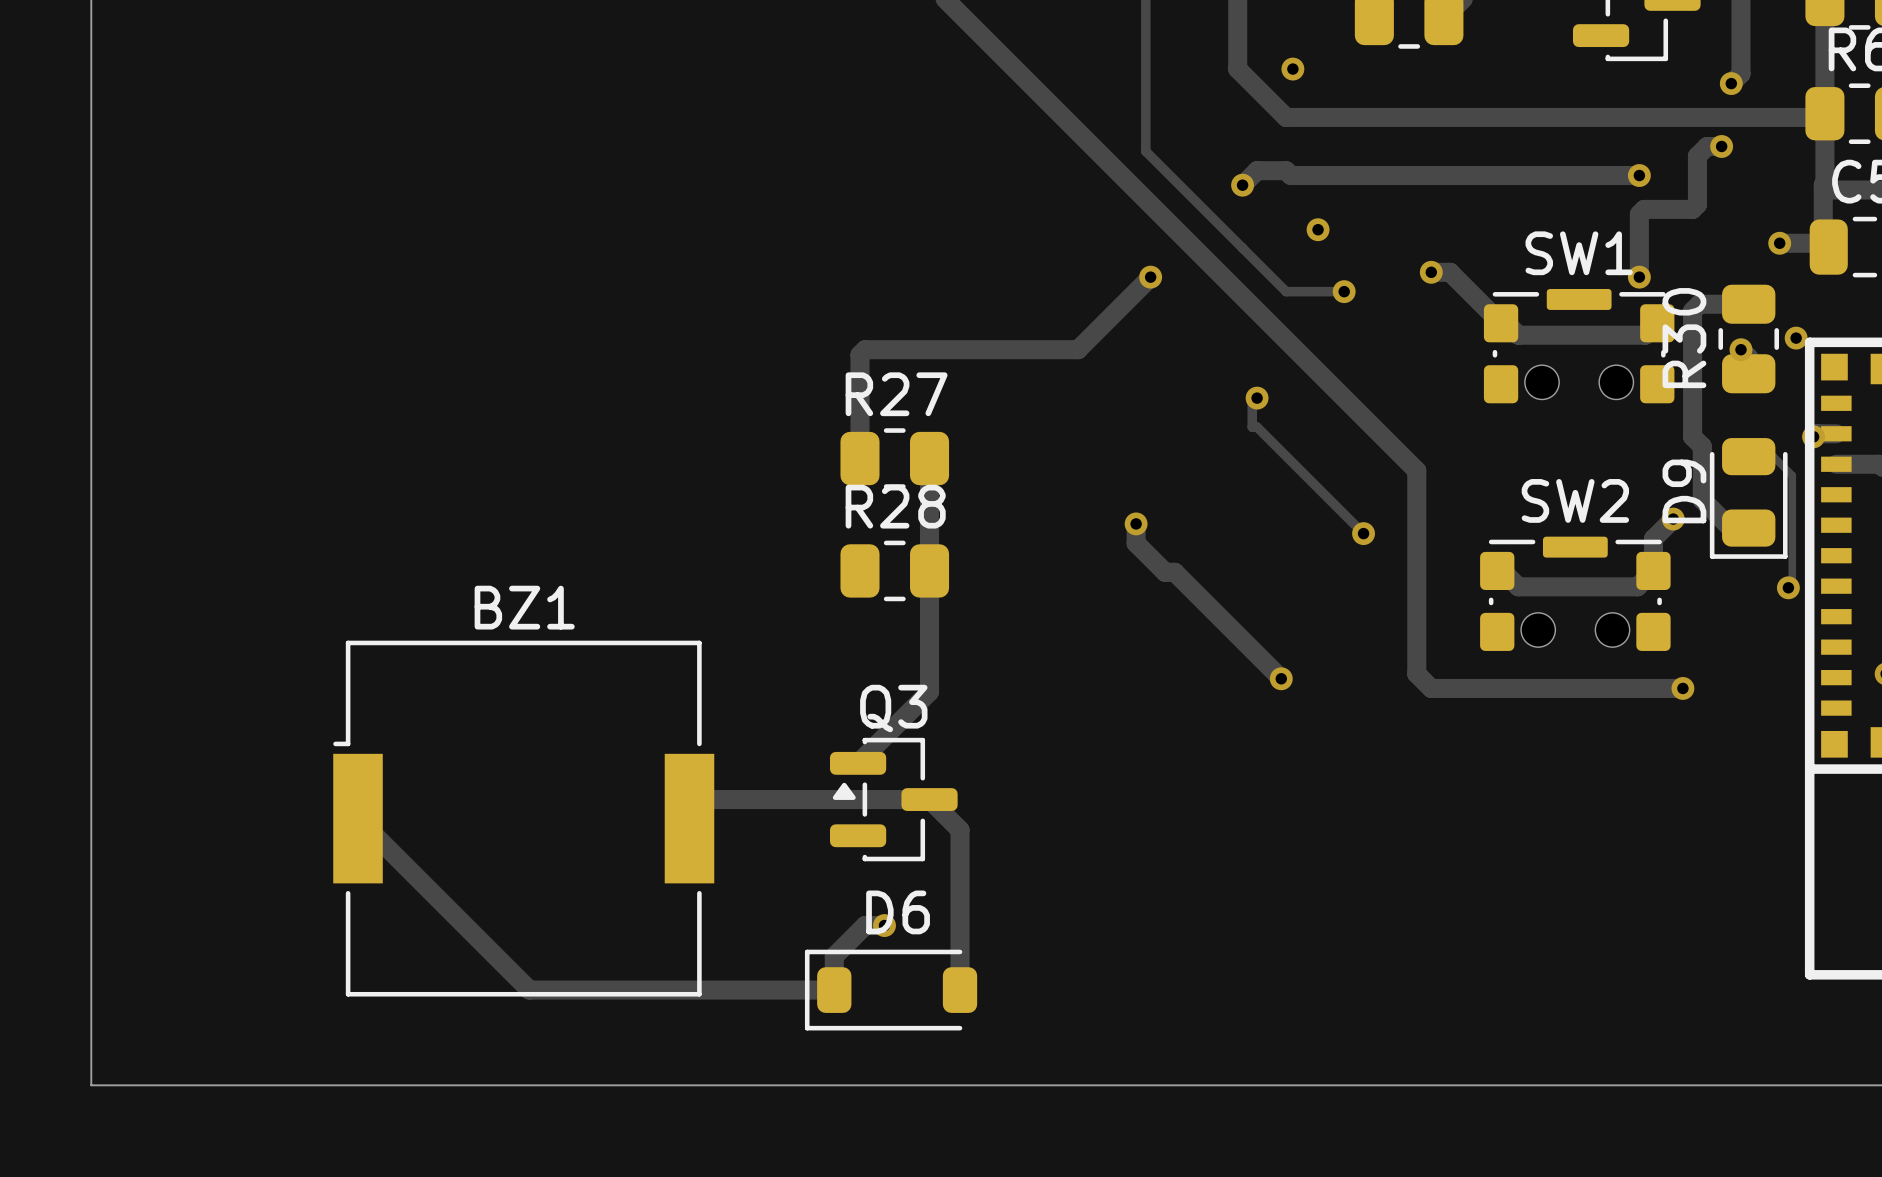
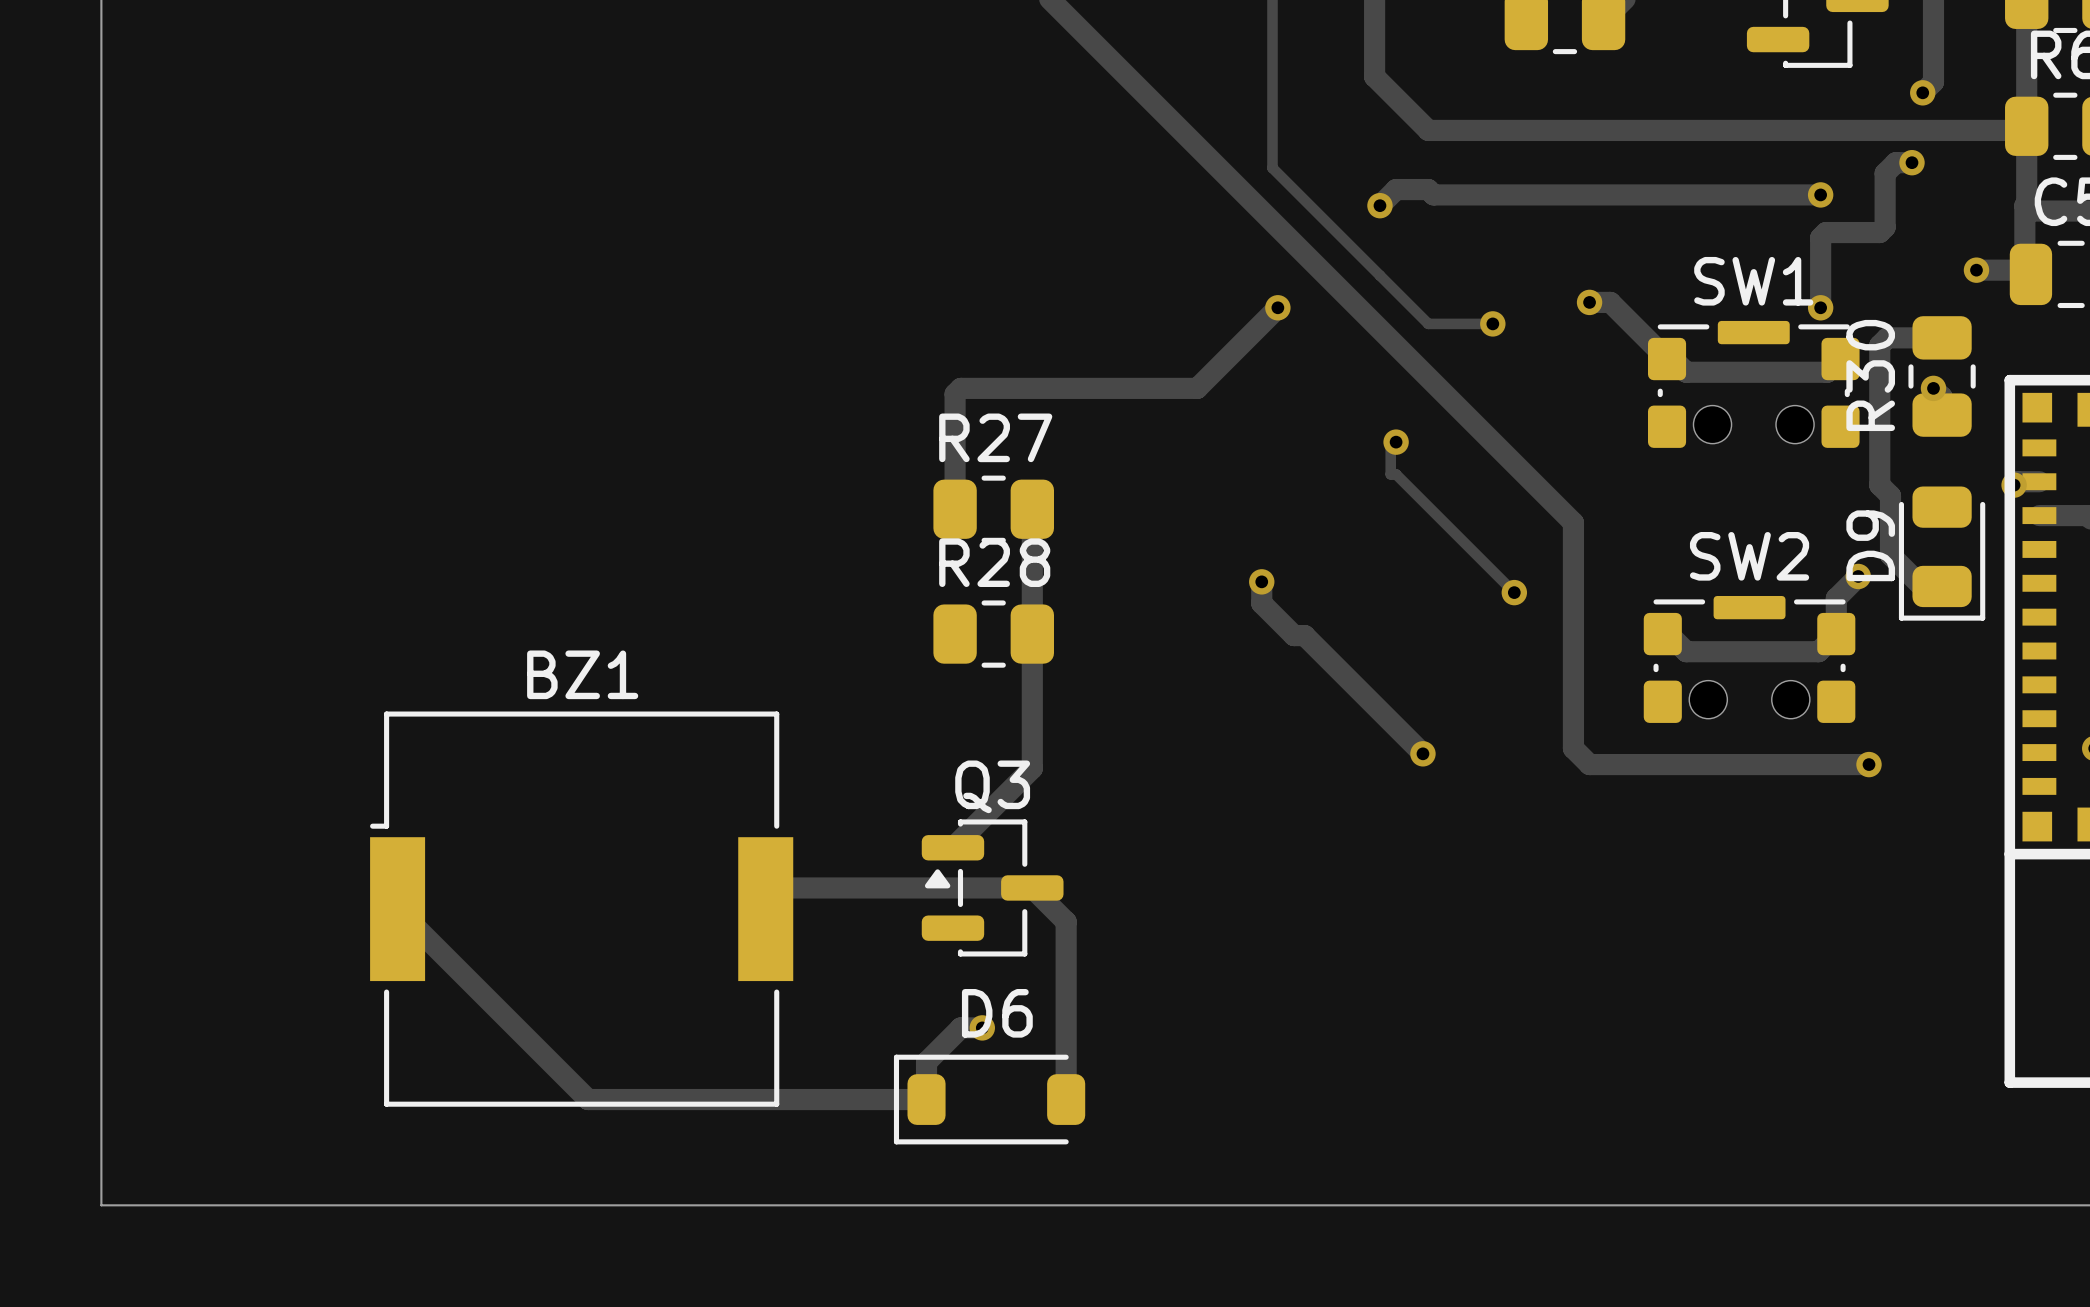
via: (1292, 69) -> none
via: (1318, 229) -> none
via: (1796, 338) -> none
track: (1748, 456) (1773, 456) (1792, 475) (1792, 583) (1788, 587) -> none
via: (1788, 587) -> none

